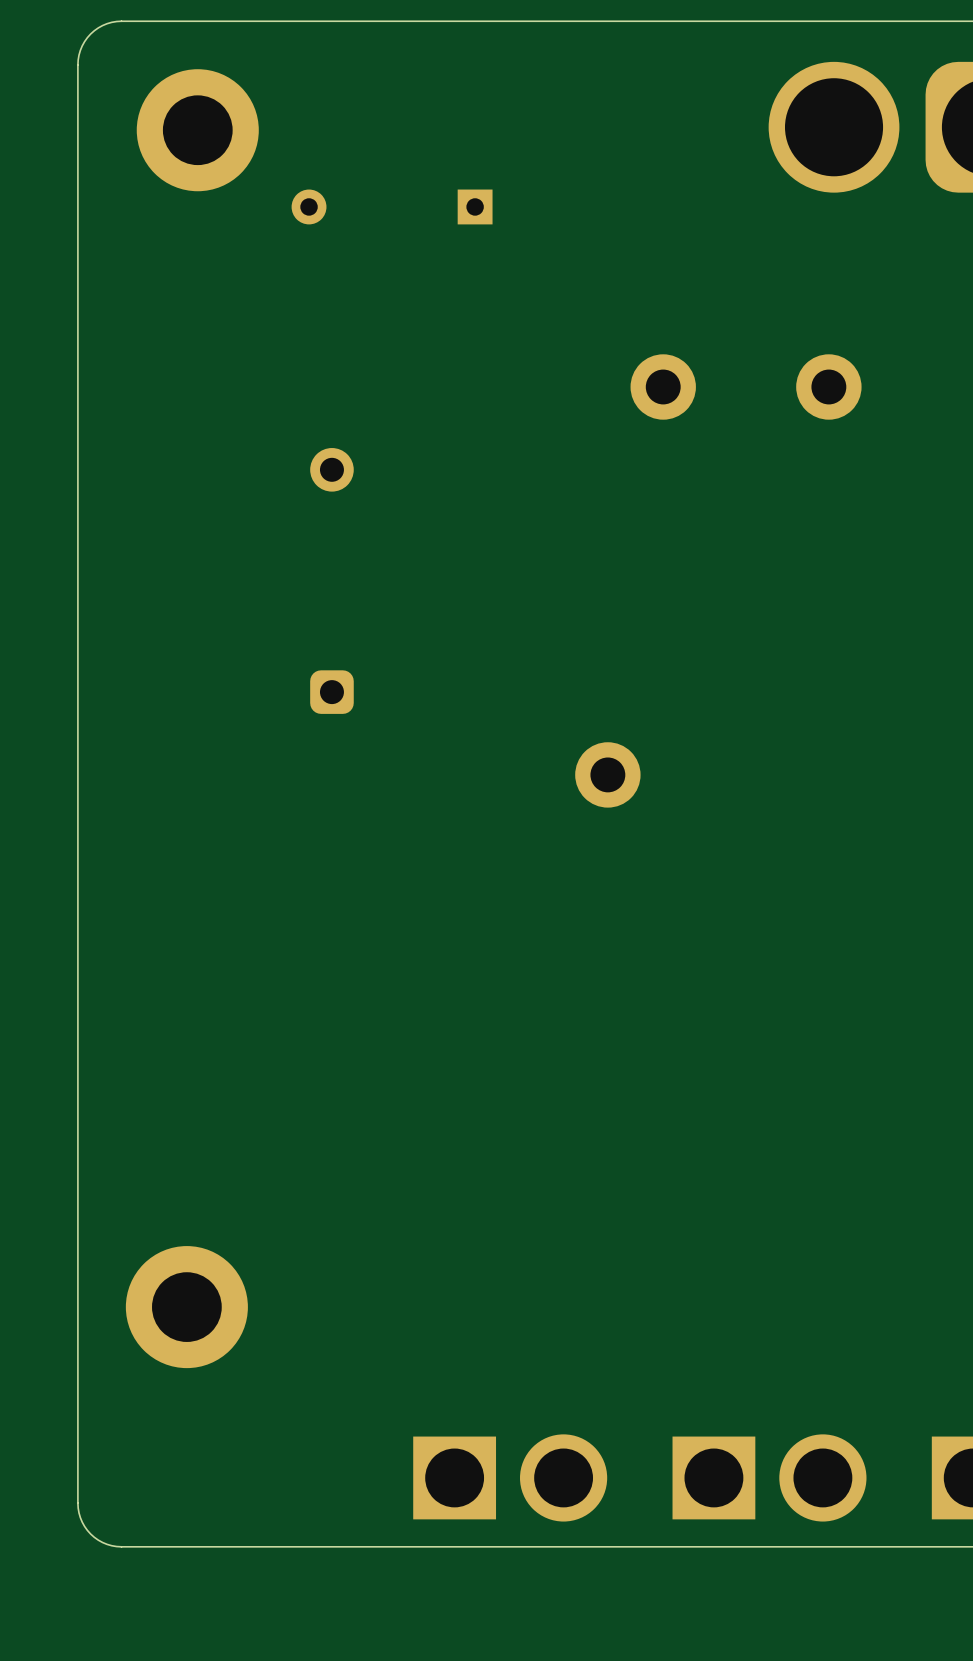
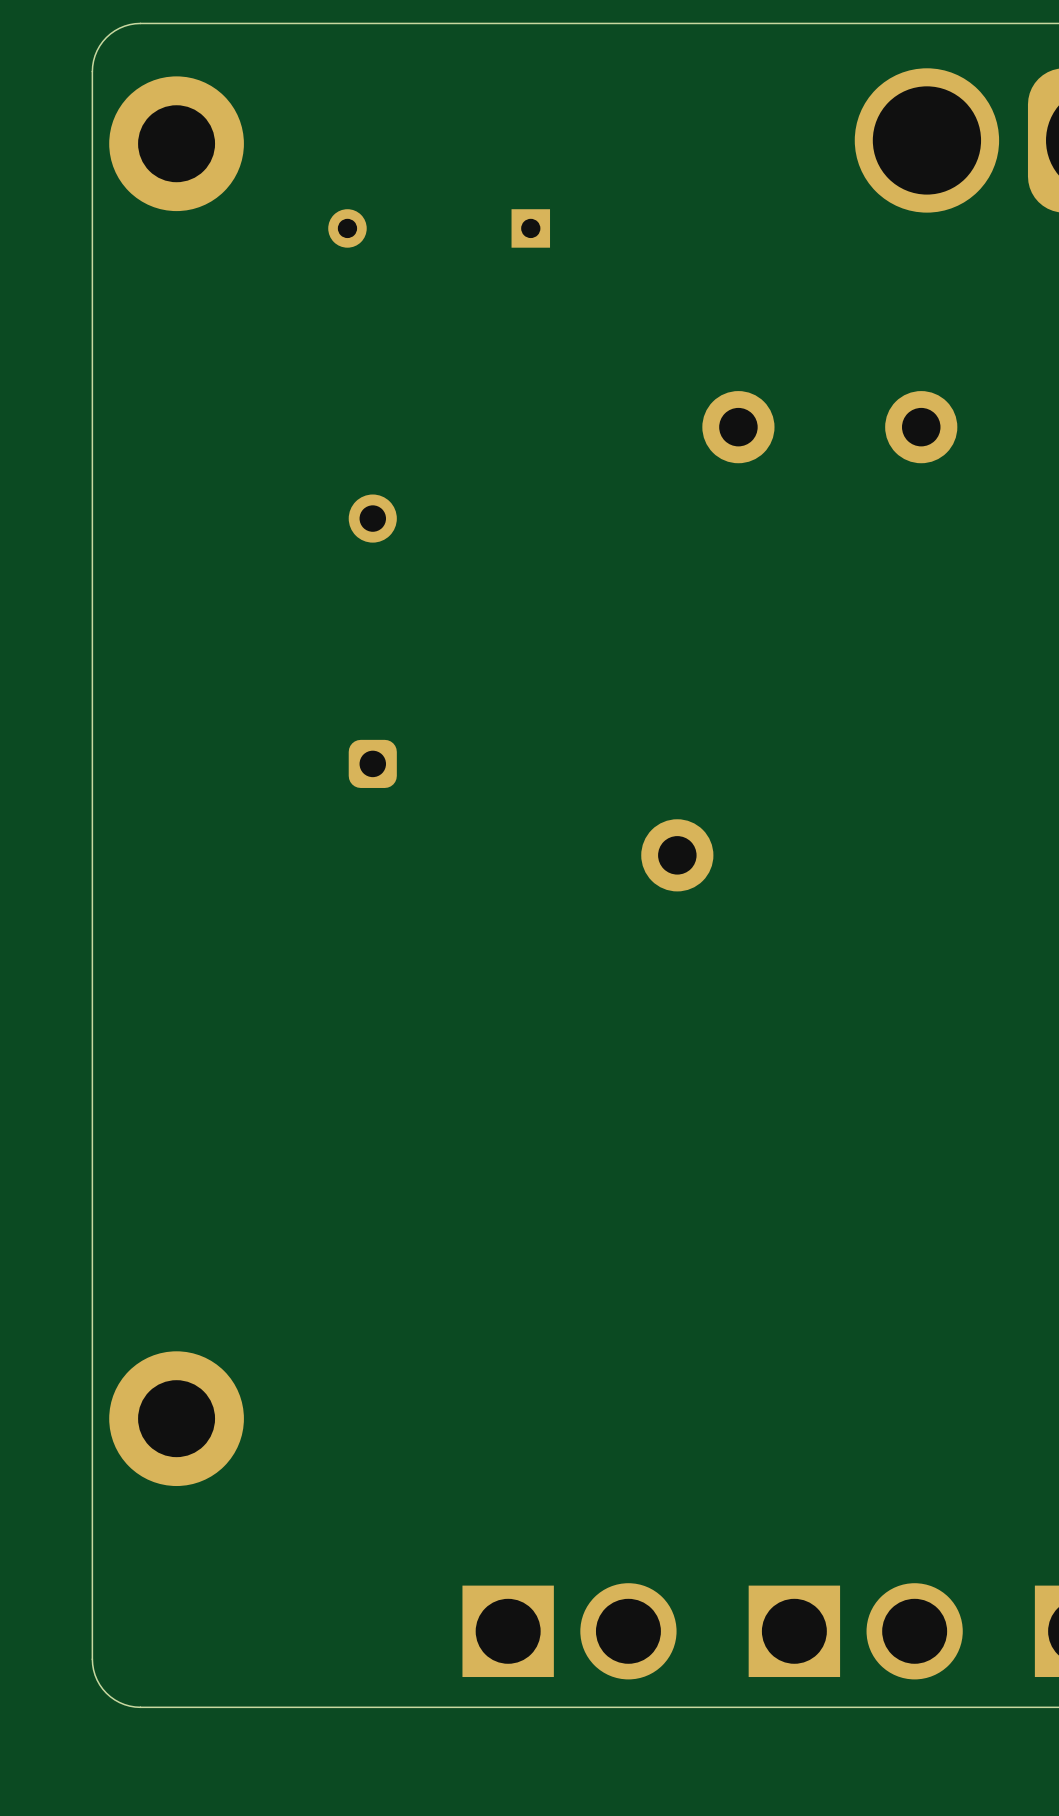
part position: (197, 130) -> (176, 143)
part position: (186, 1307) -> (176, 1418)

